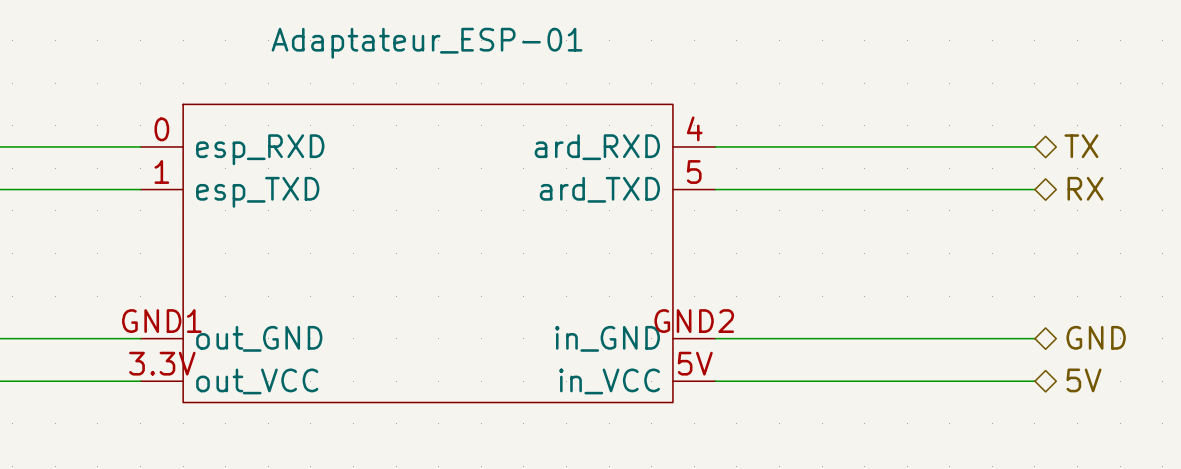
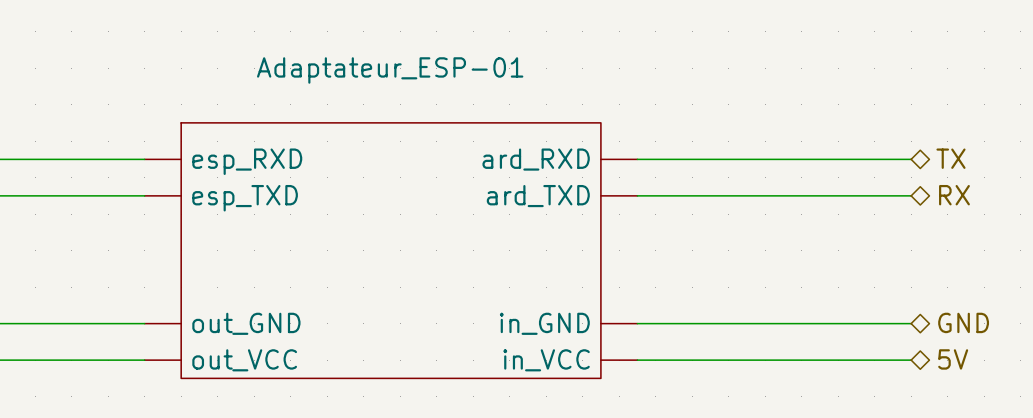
Adaptateur_ESP-01 pin number: 4 (694, 128) -> none
Adaptateur_ESP-01 pin number: 0 (161, 129) -> none
Adaptateur_ESP-01 pin number: 1 (161, 172) -> none
Adaptateur_ESP-01 pin number: 5 (694, 172) -> none
Adaptateur_ESP-01 pin number: GND1 (161, 321) -> none
Adaptateur_ESP-01 pin number: GND2 (694, 321) -> none
Adaptateur_ESP-01 pin number: 3.3V (162, 363) -> none
Adaptateur_ESP-01 pin number: 5V (695, 363) -> none

